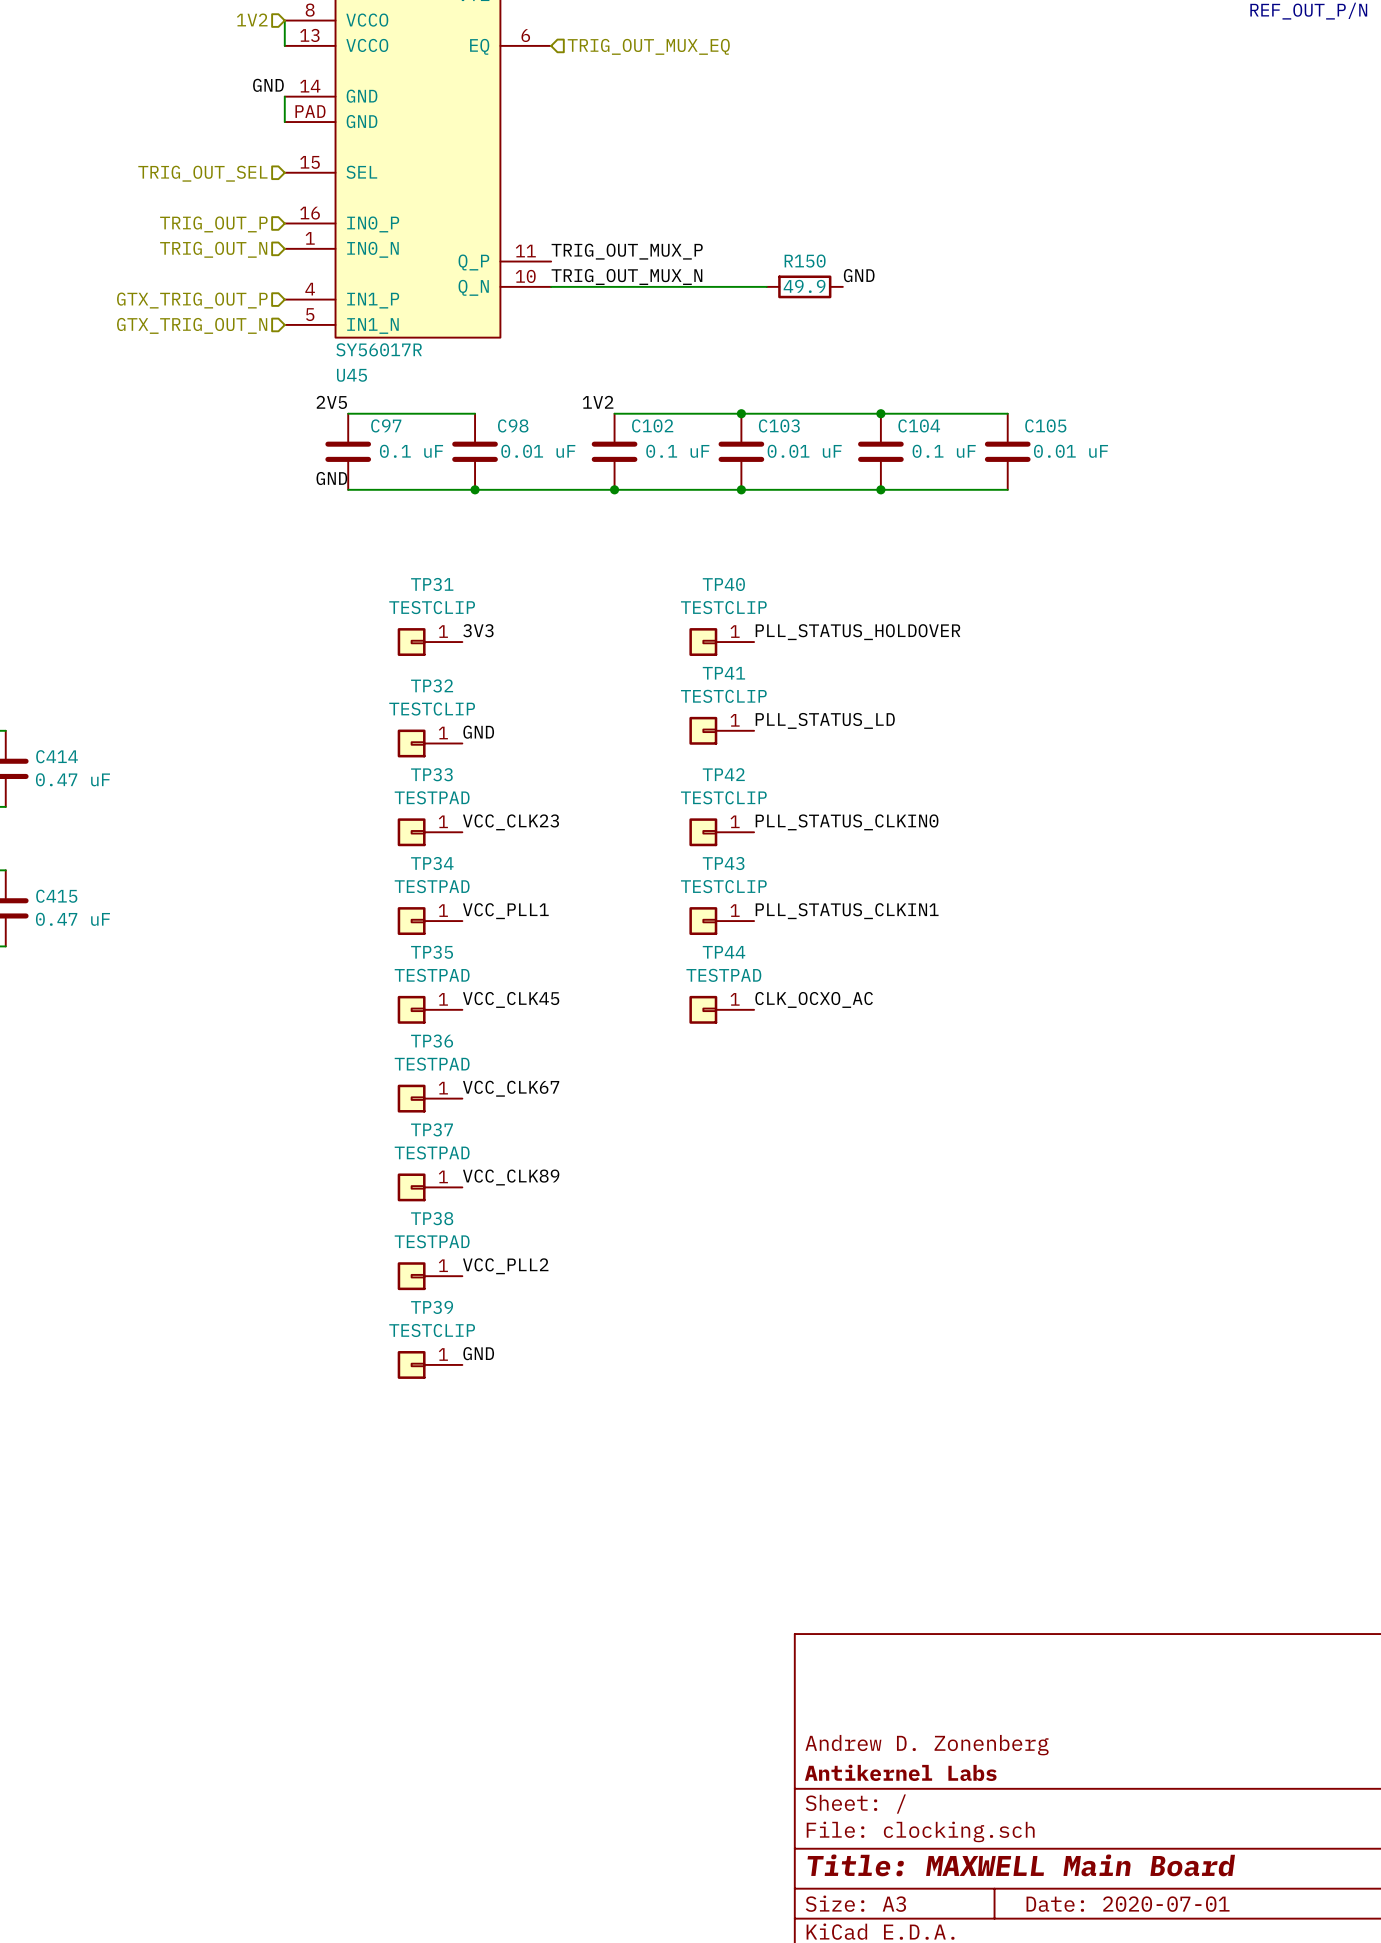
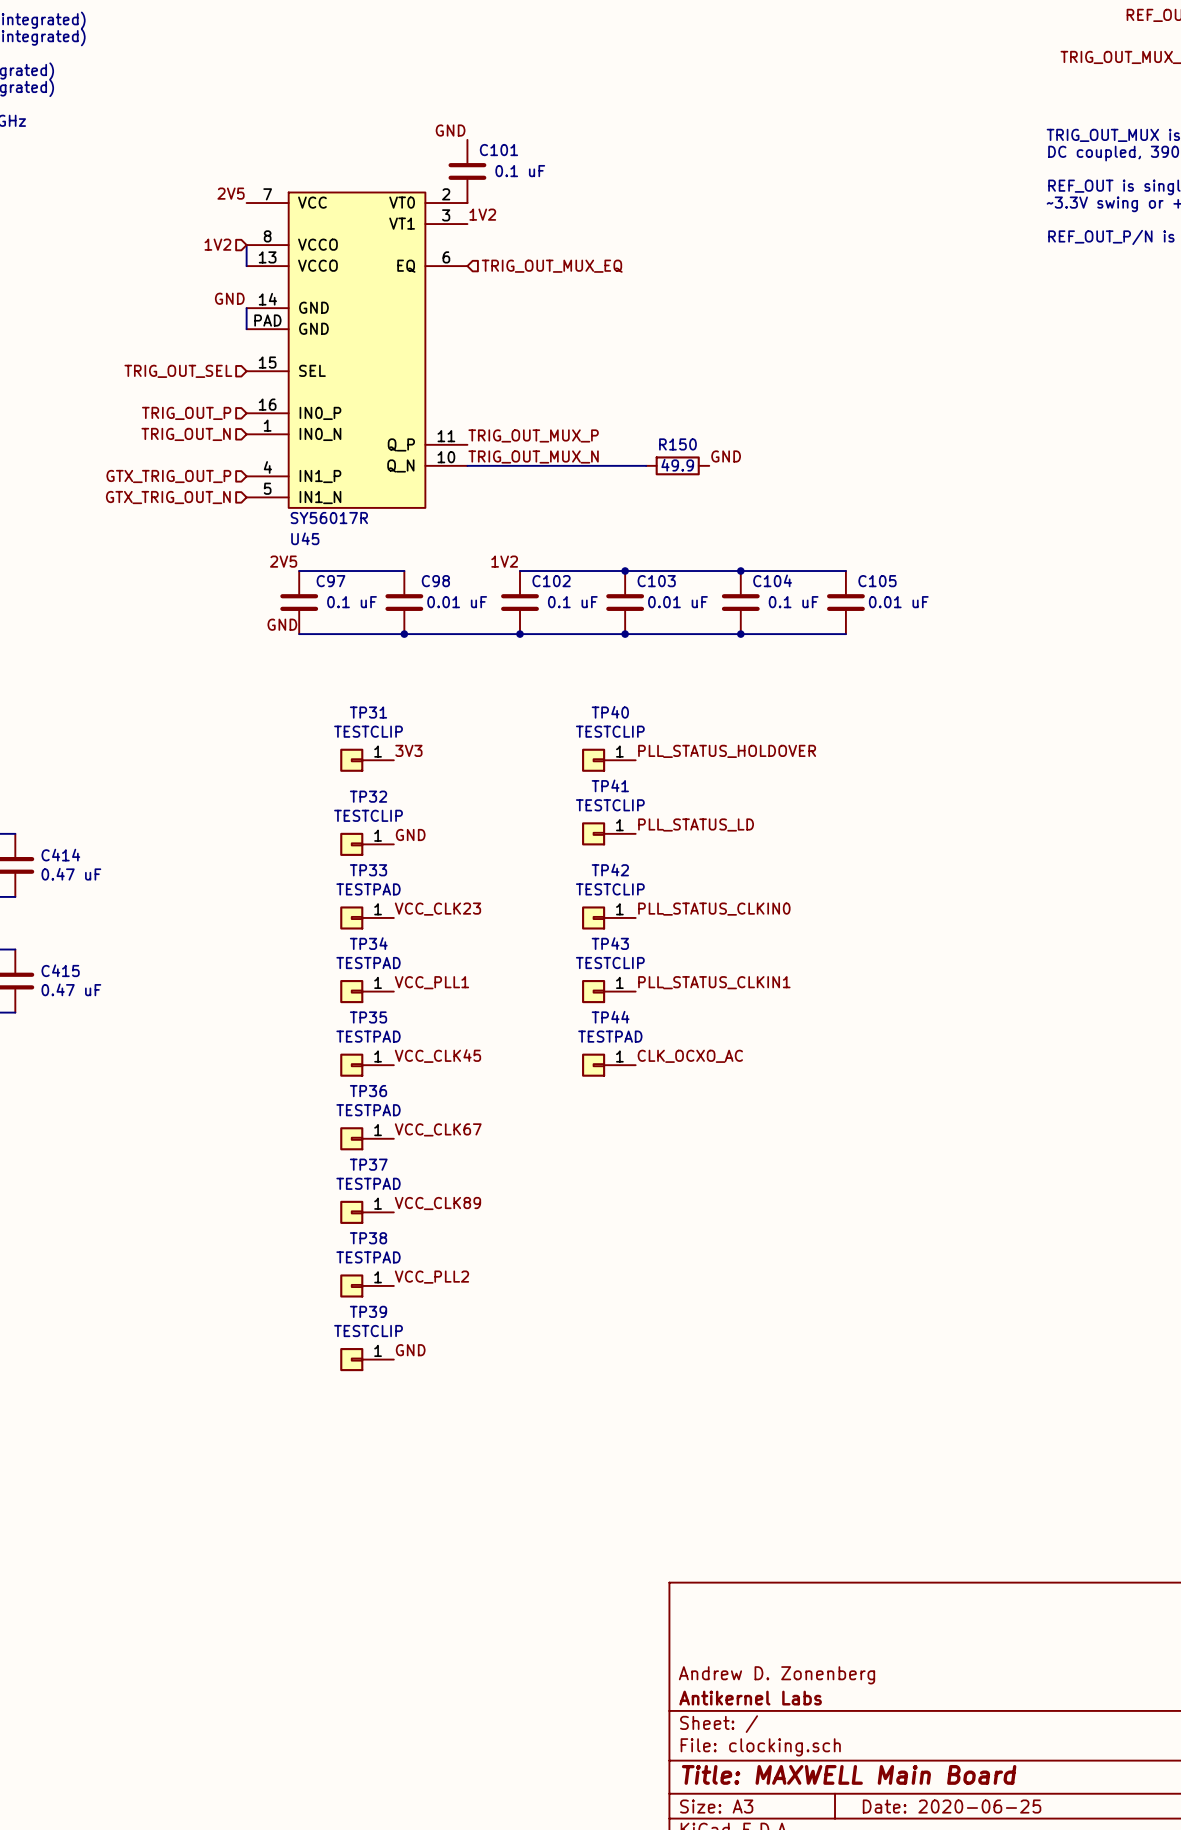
title block: Date: 2020-07-01 (1128, 1904) -> Date: 2020-06-25 (952, 1806)

